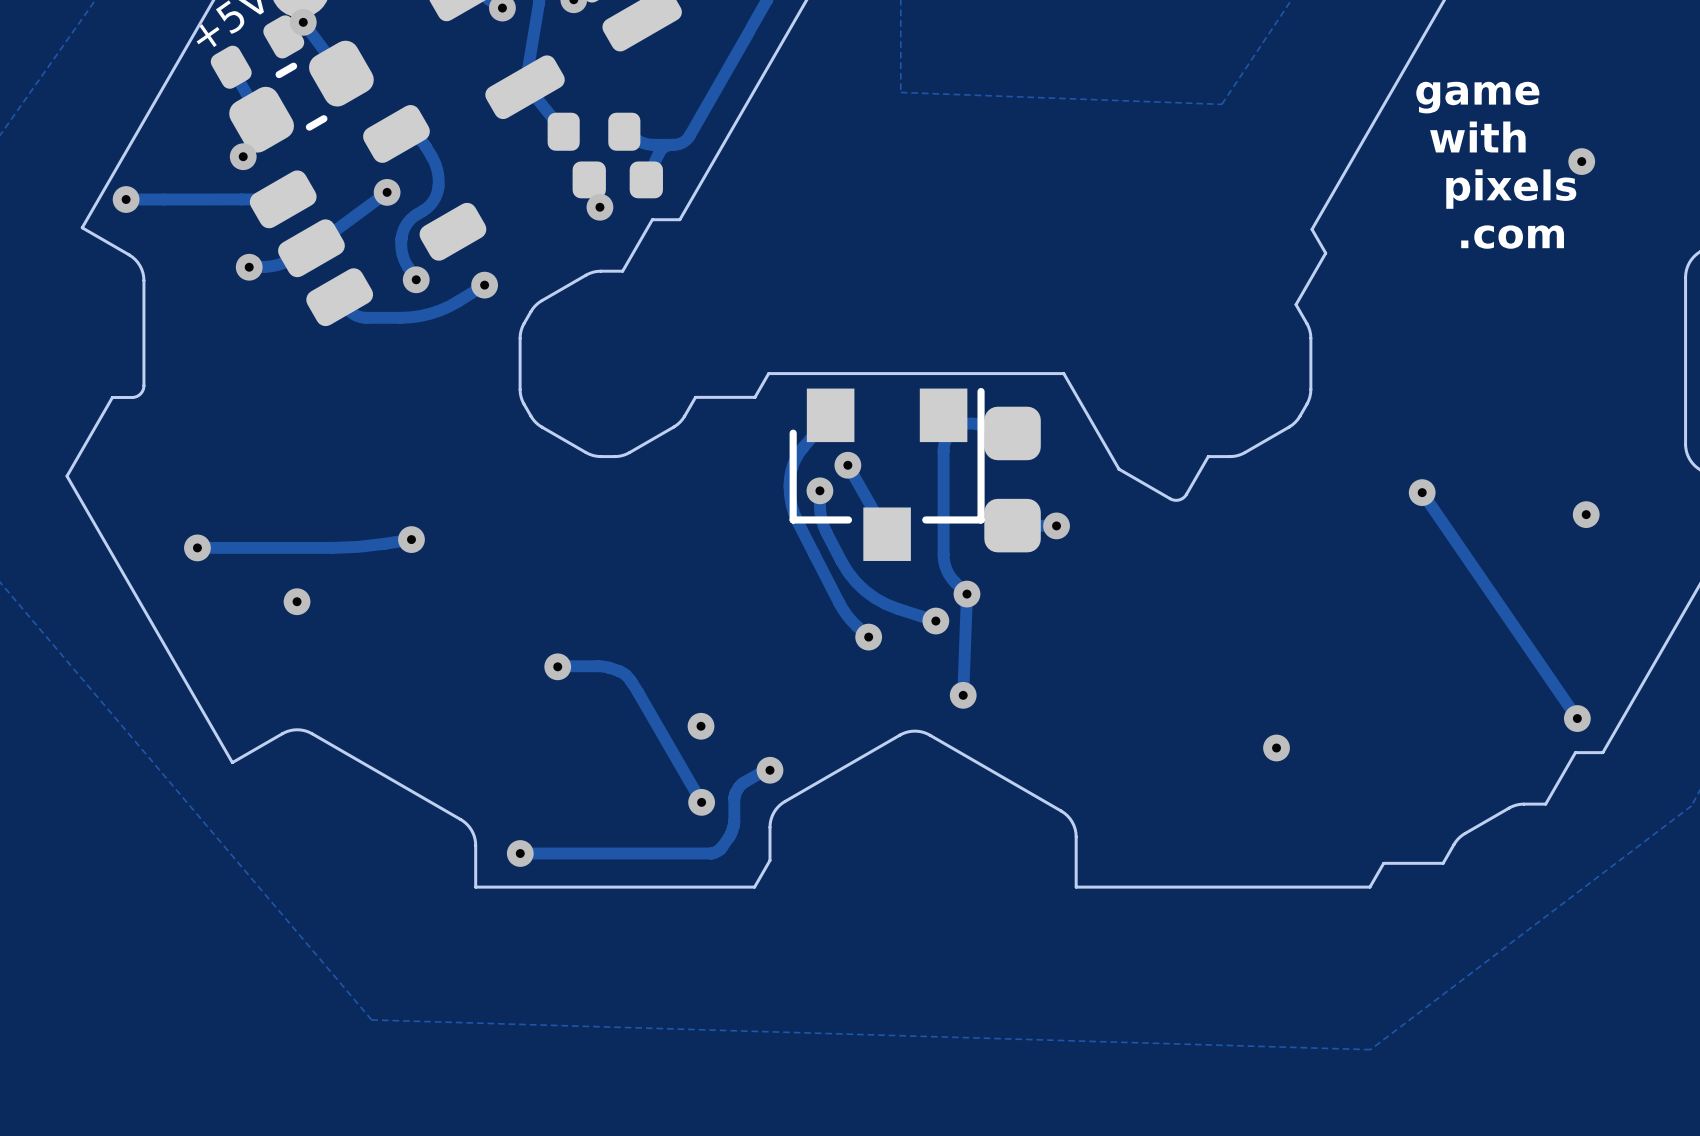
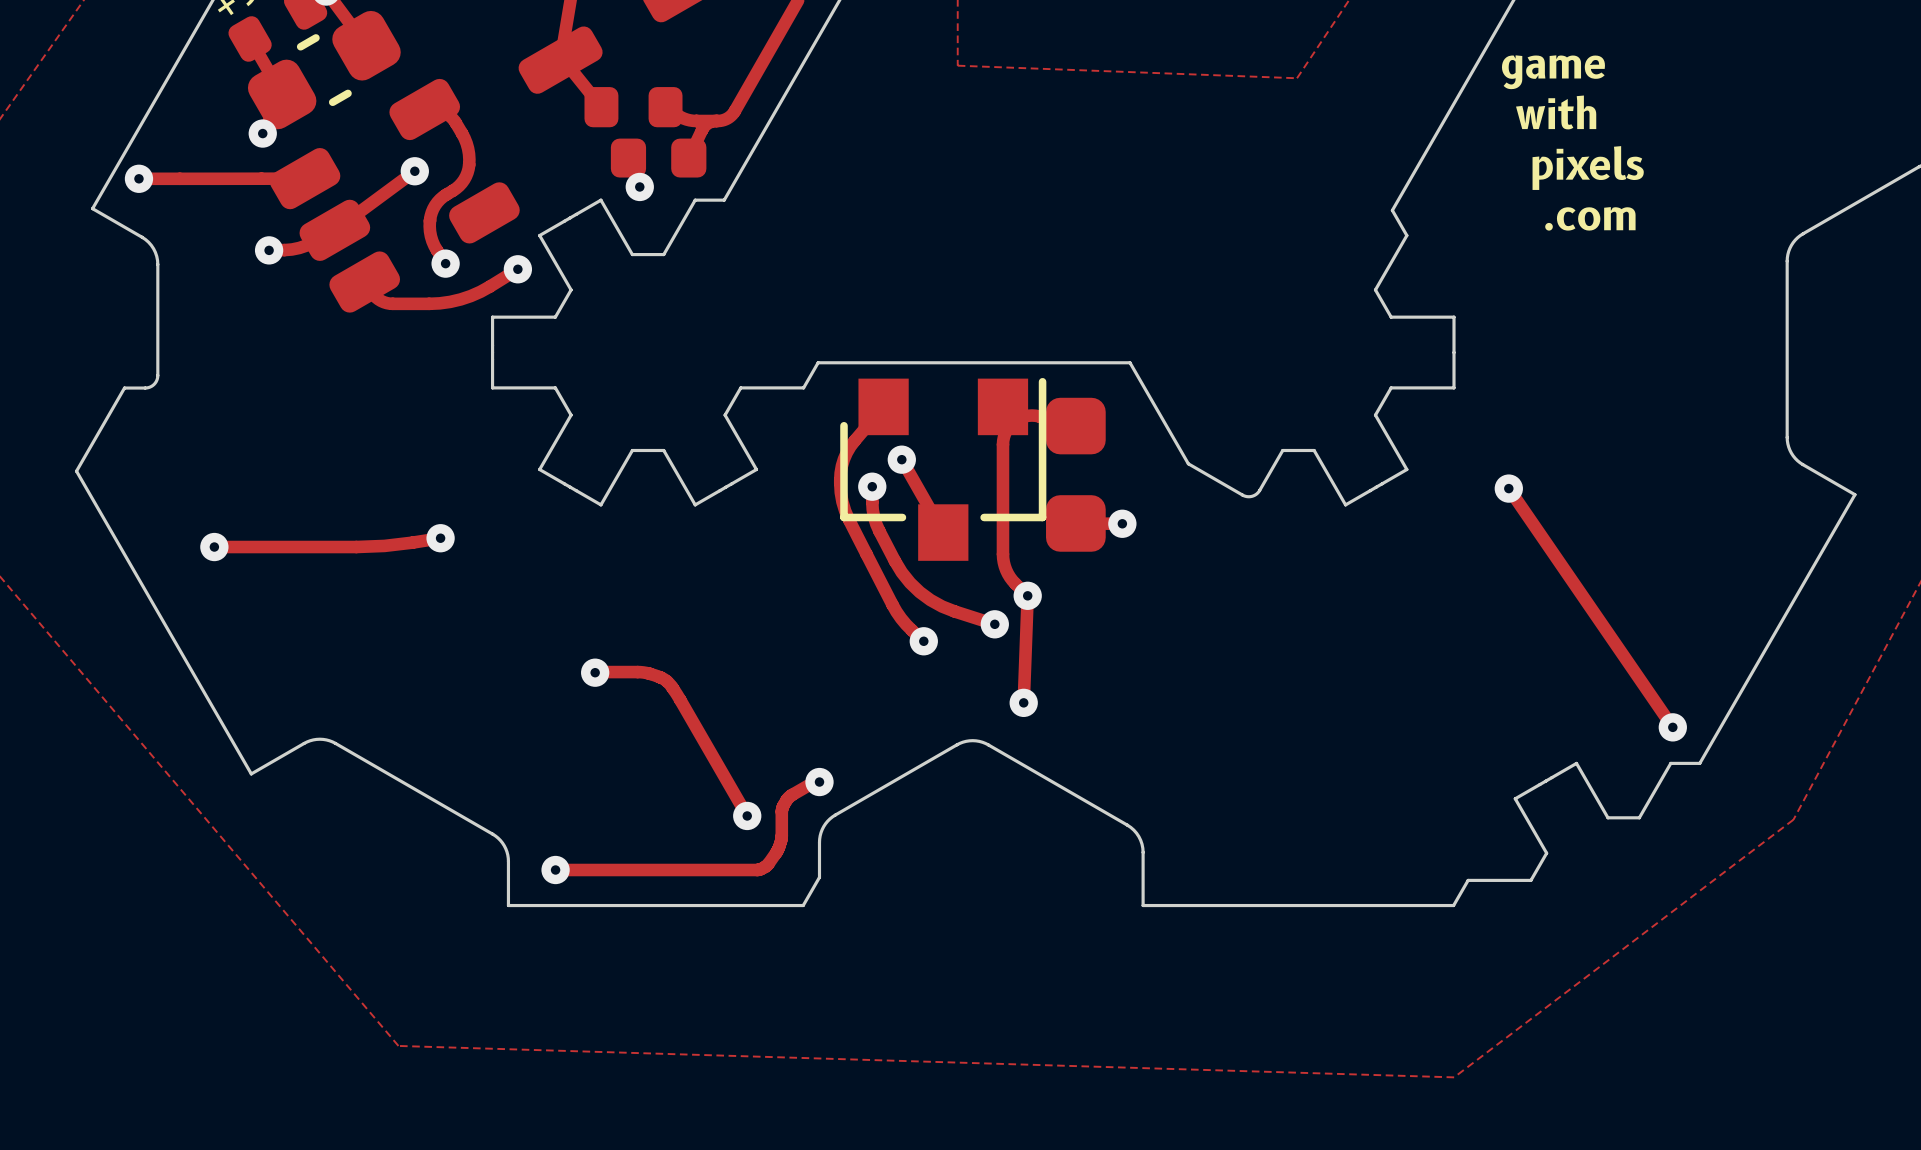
via: (1581, 161) -> none
board edge: (600, 271) (586, 275) (539, 302) (530, 311) -> (640, 254) (632, 254) (600, 200) (539, 235) (571, 289) (566, 297)
board edge: (524, 323) (520, 338) (520, 391) (524, 404) -> (559, 309) (555, 317) (492, 317) (492, 387) (555, 387) (559, 395)
board edge: (1306, 323) (1310, 338) (1310, 389) (1306, 404) -> (1386, 309) (1391, 317) (1454, 317) (1454, 387) (1391, 387) (1386, 395)
board edge: (530, 416) (541, 427) (586, 452) (600, 456) -> (566, 407) (571, 415) (539, 469) (600, 504) (632, 450) (640, 450)
board edge: (684, 416) (673, 426) (629, 452) (614, 456) -> (729, 407) (725, 415) (756, 469) (695, 504) (663, 450) (655, 450)
board edge: (1299, 416) (1289, 427) (1244, 452) (1229, 456) -> (1379, 407) (1375, 415) (1406, 469) (1345, 504) (1314, 450) (1305, 450)
via: (1586, 514) -> none
via: (297, 601) -> none
via: (701, 726) -> none
via: (1276, 748) -> none
board edge: (1523, 804) (1509, 808) (1462, 834) (1454, 844) -> (1616, 817) (1607, 817) (1576, 763) (1515, 798) (1546, 853) (1542, 860)

